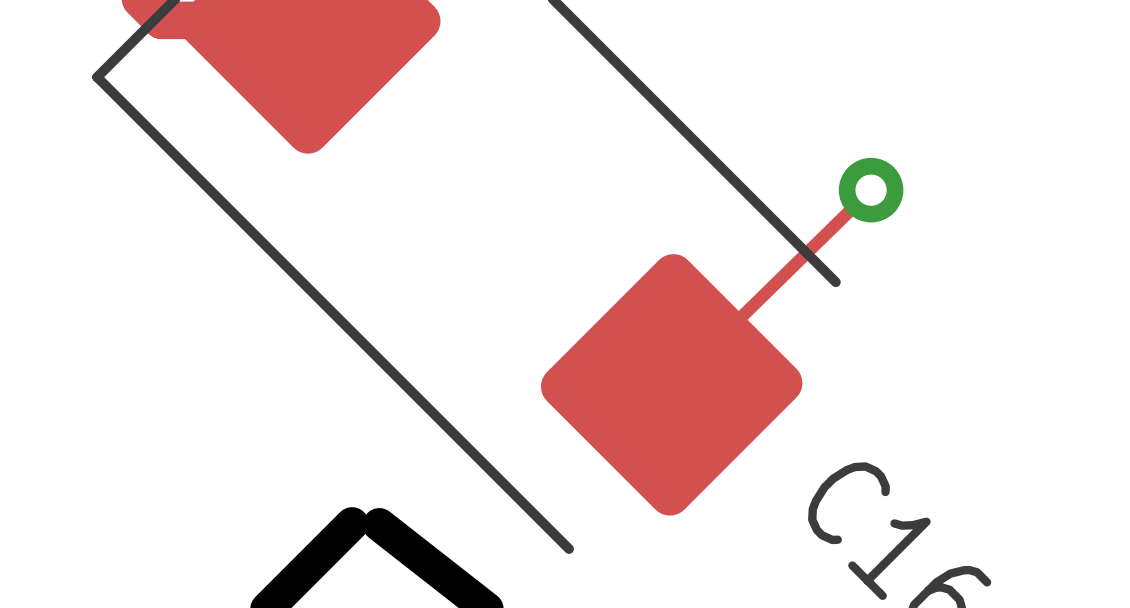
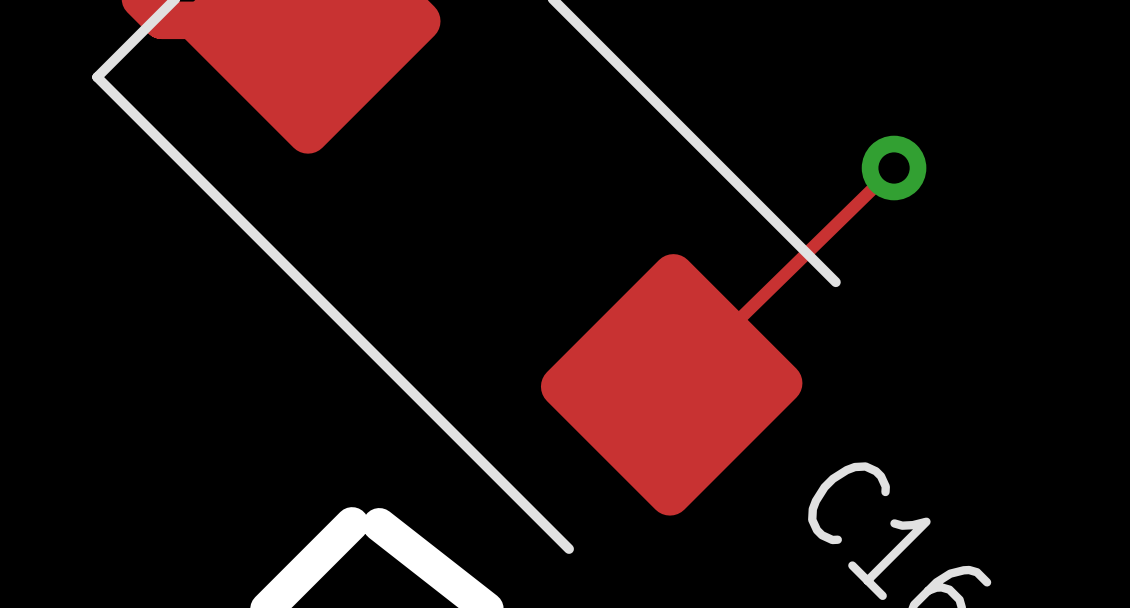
track: (871, 190) (674, 382) -> (894, 168) (674, 382)
via position: (871, 190) -> (894, 168)

